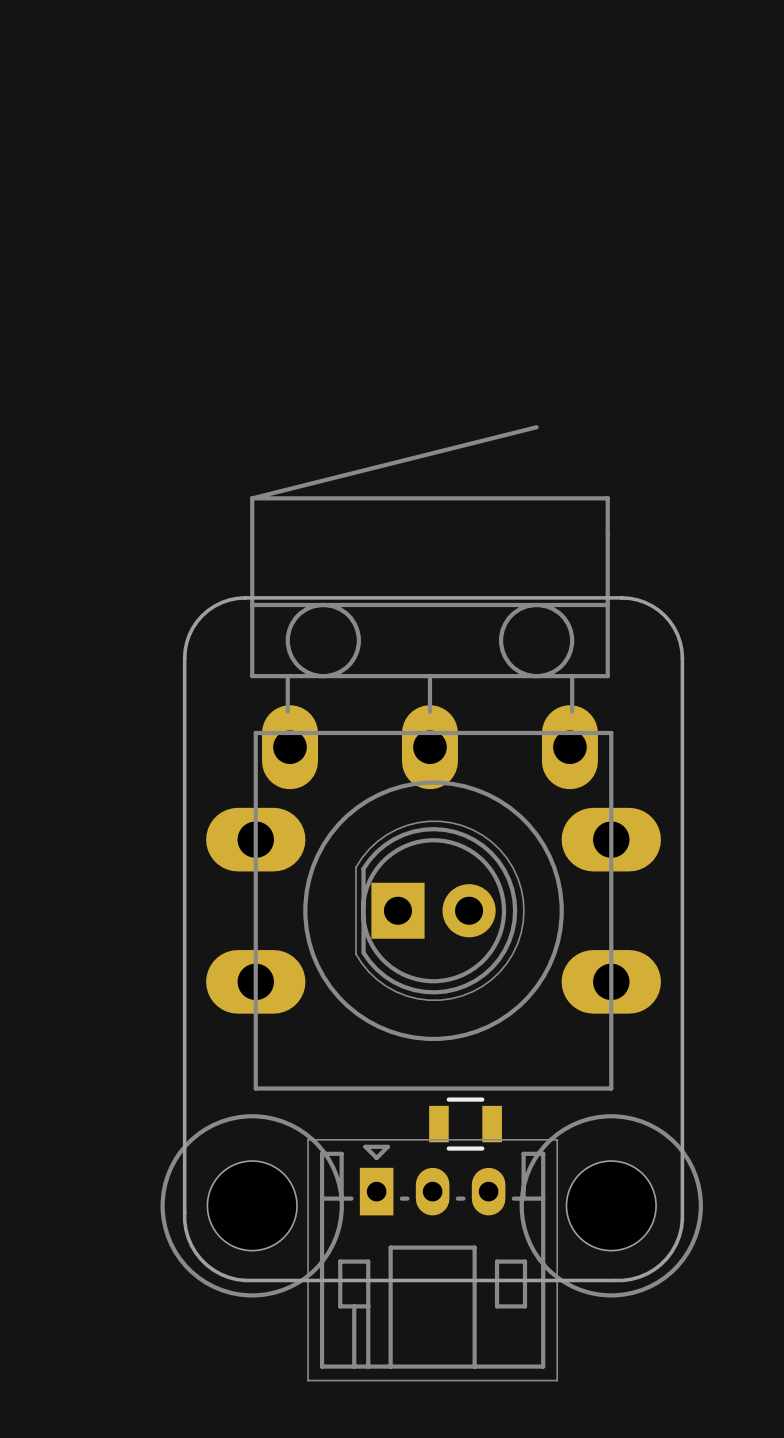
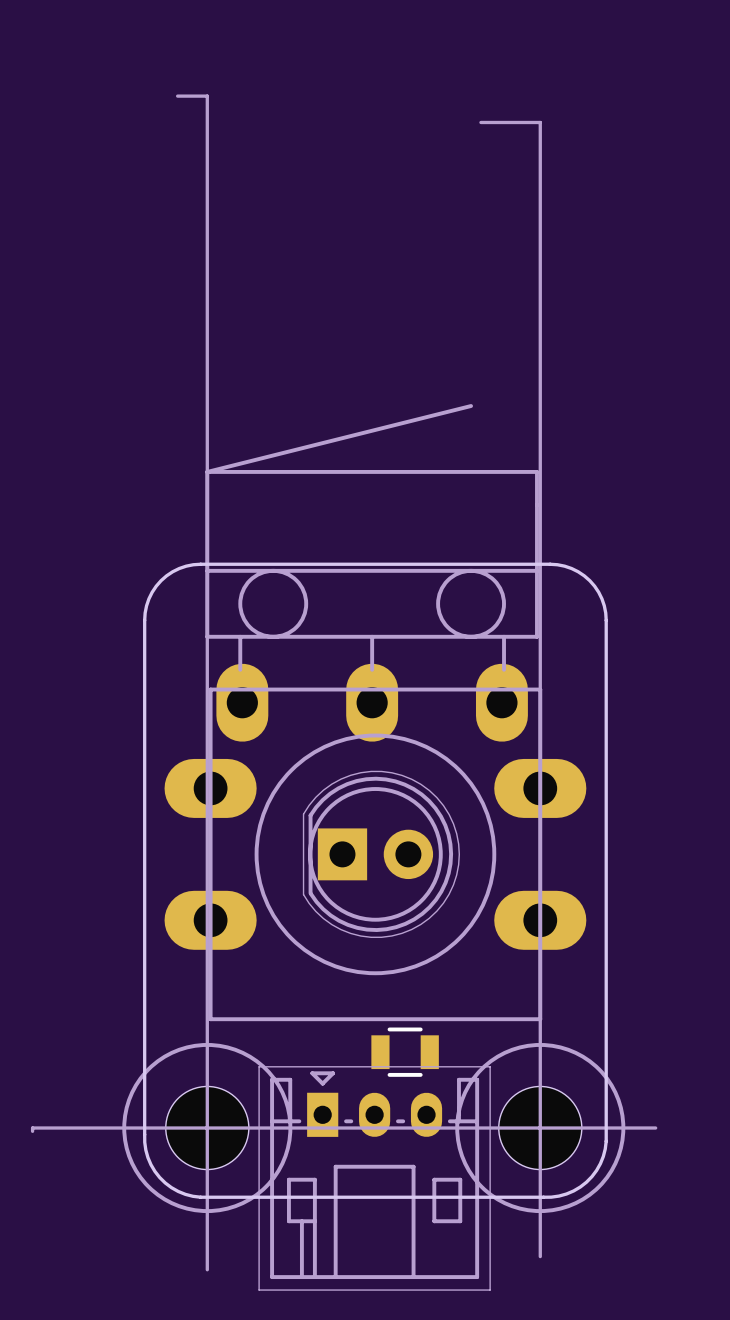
line: none -> (177, 96) (207, 96) (207, 1269)
line: none -> (480, 122) (540, 122) (540, 1256)
line: none -> (655, 1128) (32, 1128) (32, 1131)

